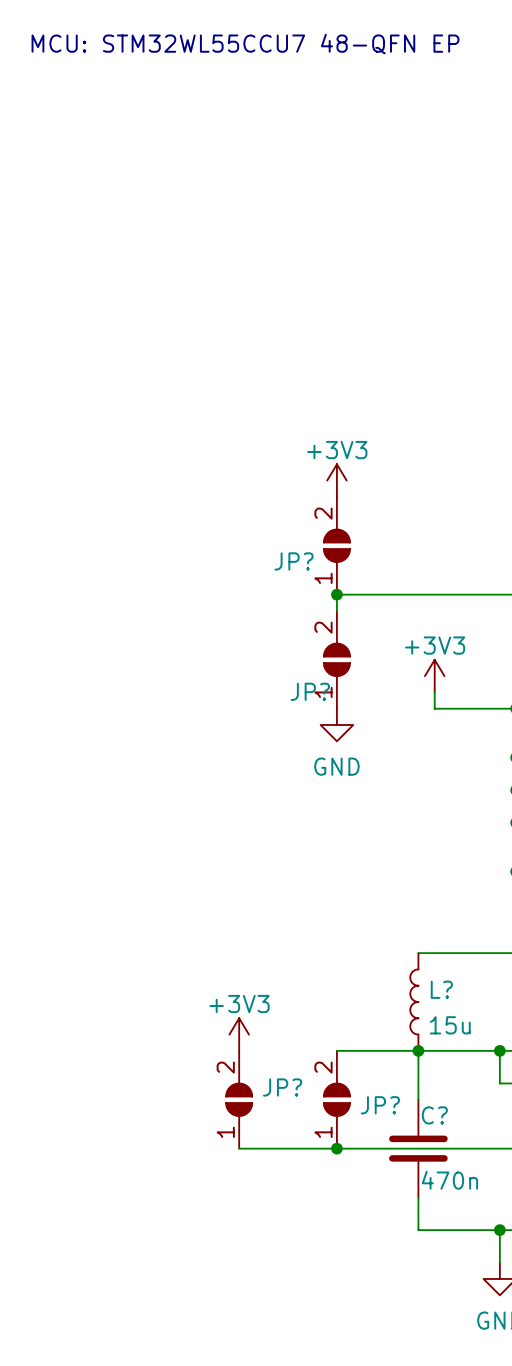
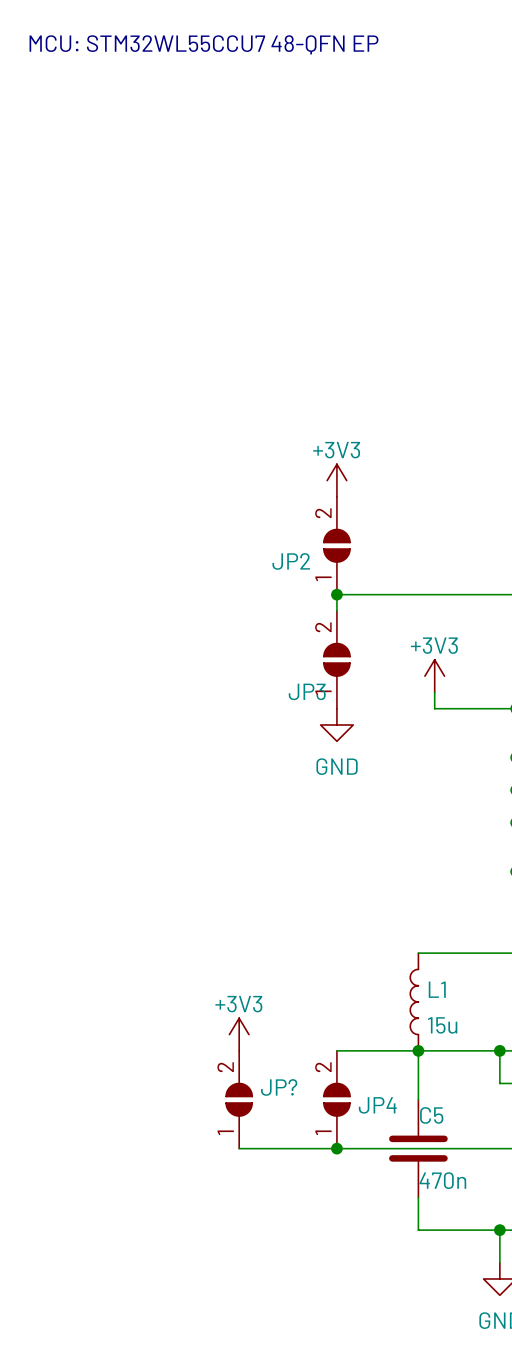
JP? name: JP? (294, 561) -> JP2 (291, 561)
JP? name: JP? (310, 691) -> JP3 (307, 691)
L? name: L? (441, 989) -> L1 (437, 989)
JP? name: JP? (380, 1105) -> JP4 (377, 1105)
C? name: C? (434, 1115) -> C5 (431, 1115)

